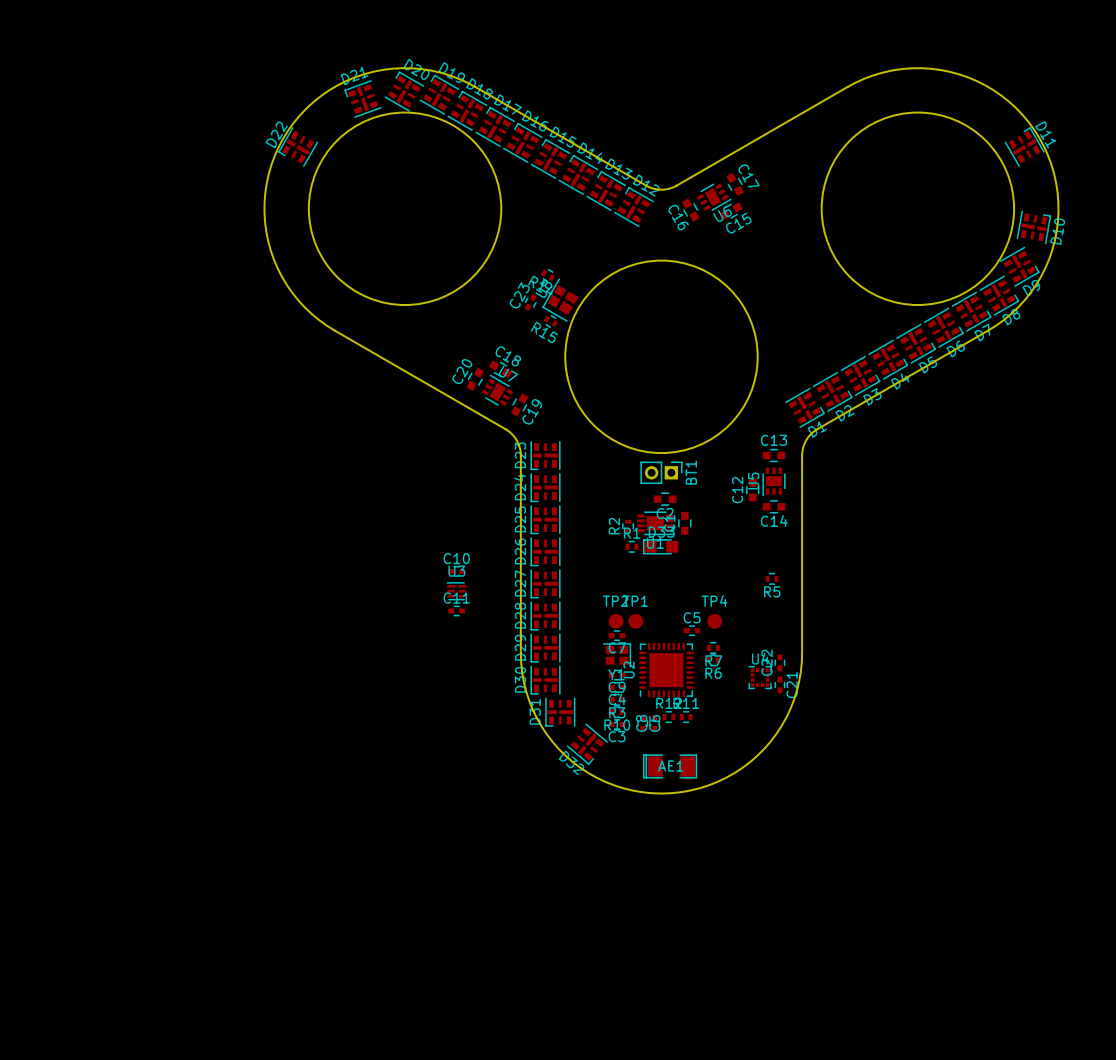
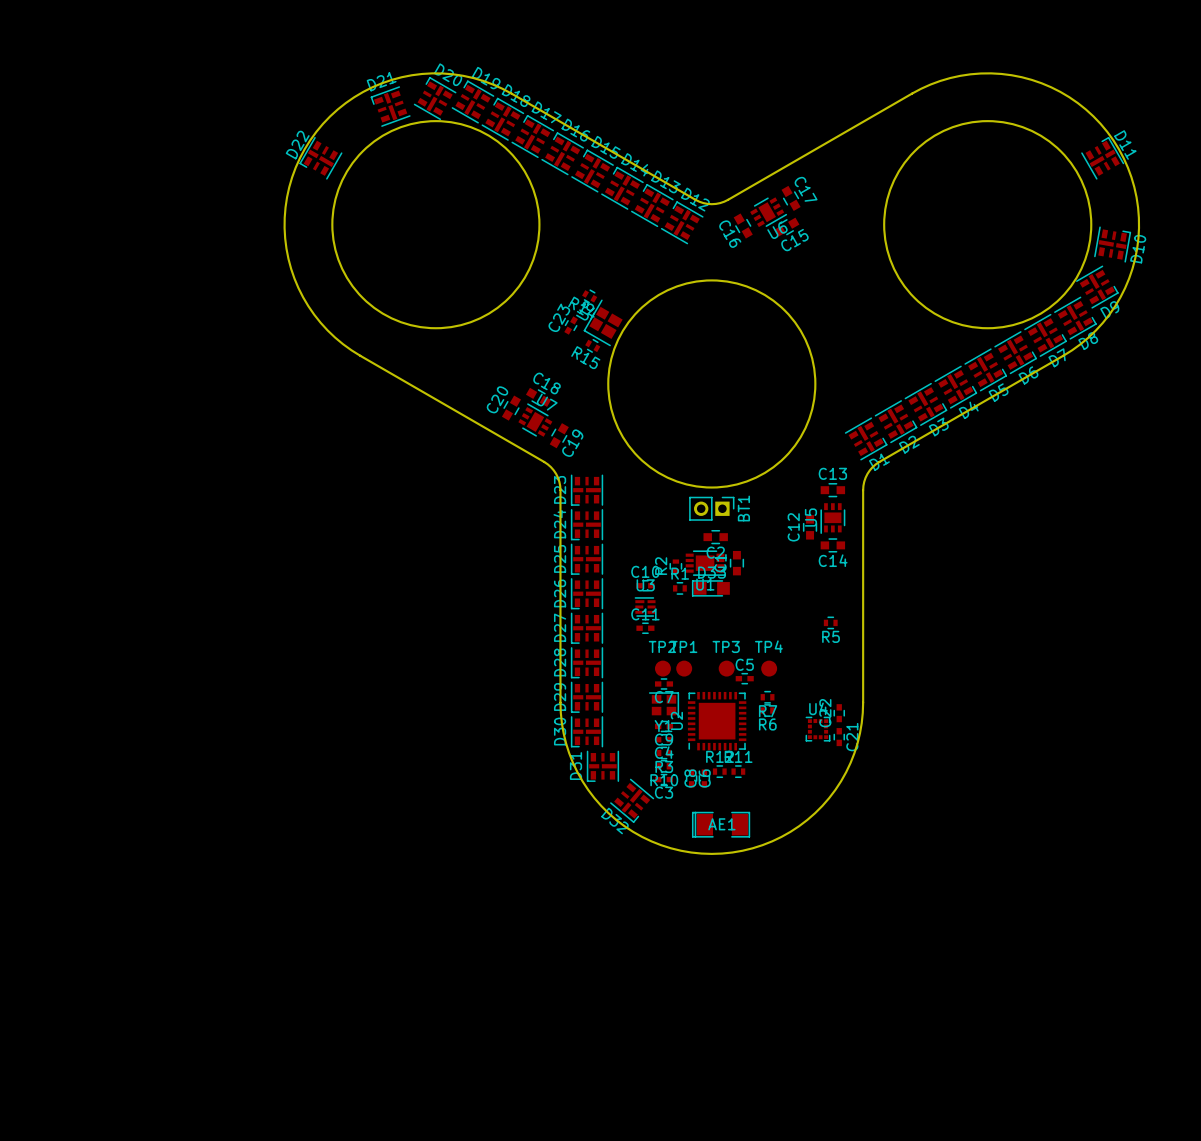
C10 position: (456, 571) -> (645, 585)
U3 position: (456, 591) -> (645, 606)
C11 position: (456, 610) -> (645, 628)
TP3: none -> (726, 668)

